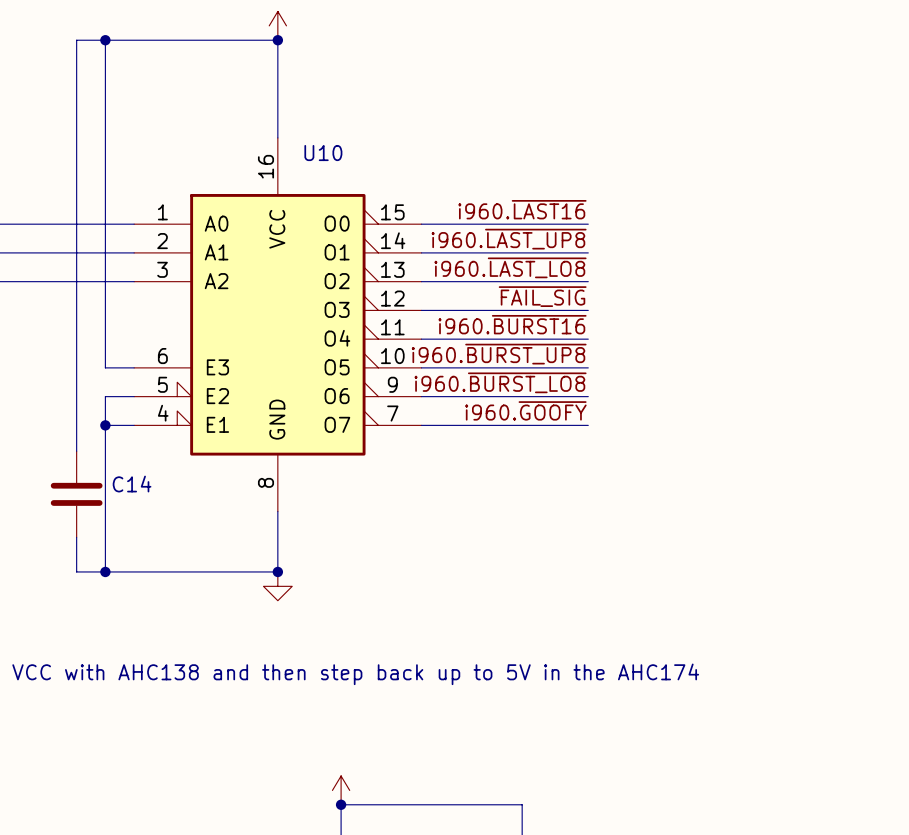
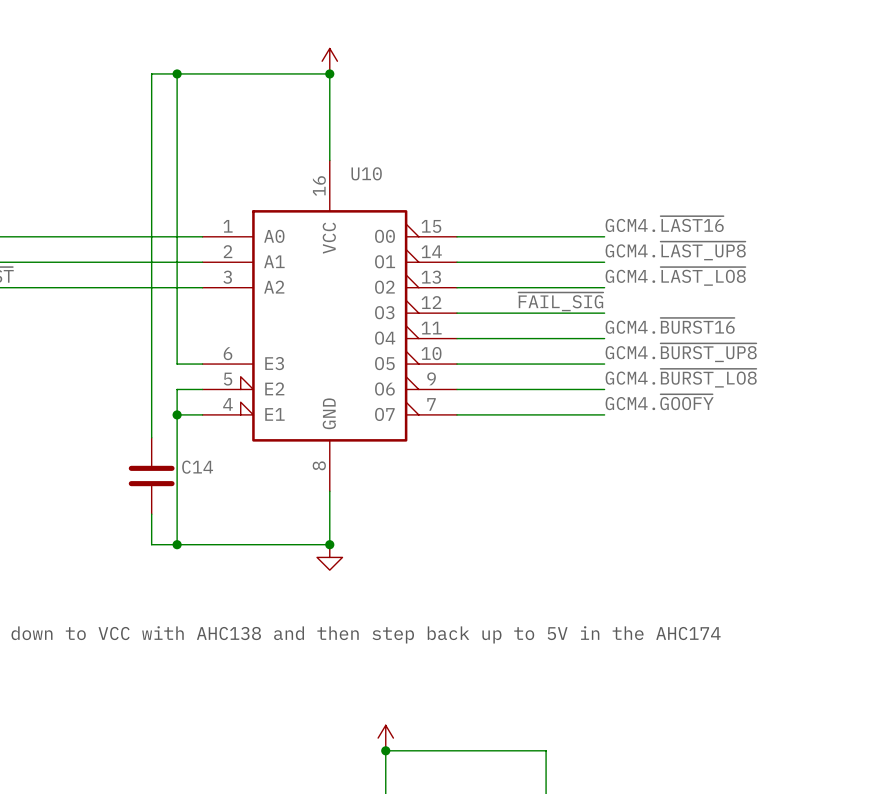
label: i960.~{LAST16} (522, 209) -> GCM4.~{LAST16} (664, 224)
label: i960.~{LAST_UP8} (509, 239) -> GCM4.~{LAST_UP8} (675, 250)
label: i960.~{LAST_LO8} (510, 267) -> GCM4.~{LAST_LO8} (675, 276)
label: i960.~{BURST16} (512, 324) -> GCM4.~{BURST16} (670, 325)
label: i960.~{BURST_UP8} (499, 354) -> GCM4.~{BURST_UP8} (681, 352)
label: i960.~{BURST_LO8} (500, 382) -> GCM4.~{BURST_LO8} (681, 378)
label: i960.~{GOOFY} (525, 410) -> GCM4.~{GOOFY} (659, 402)

